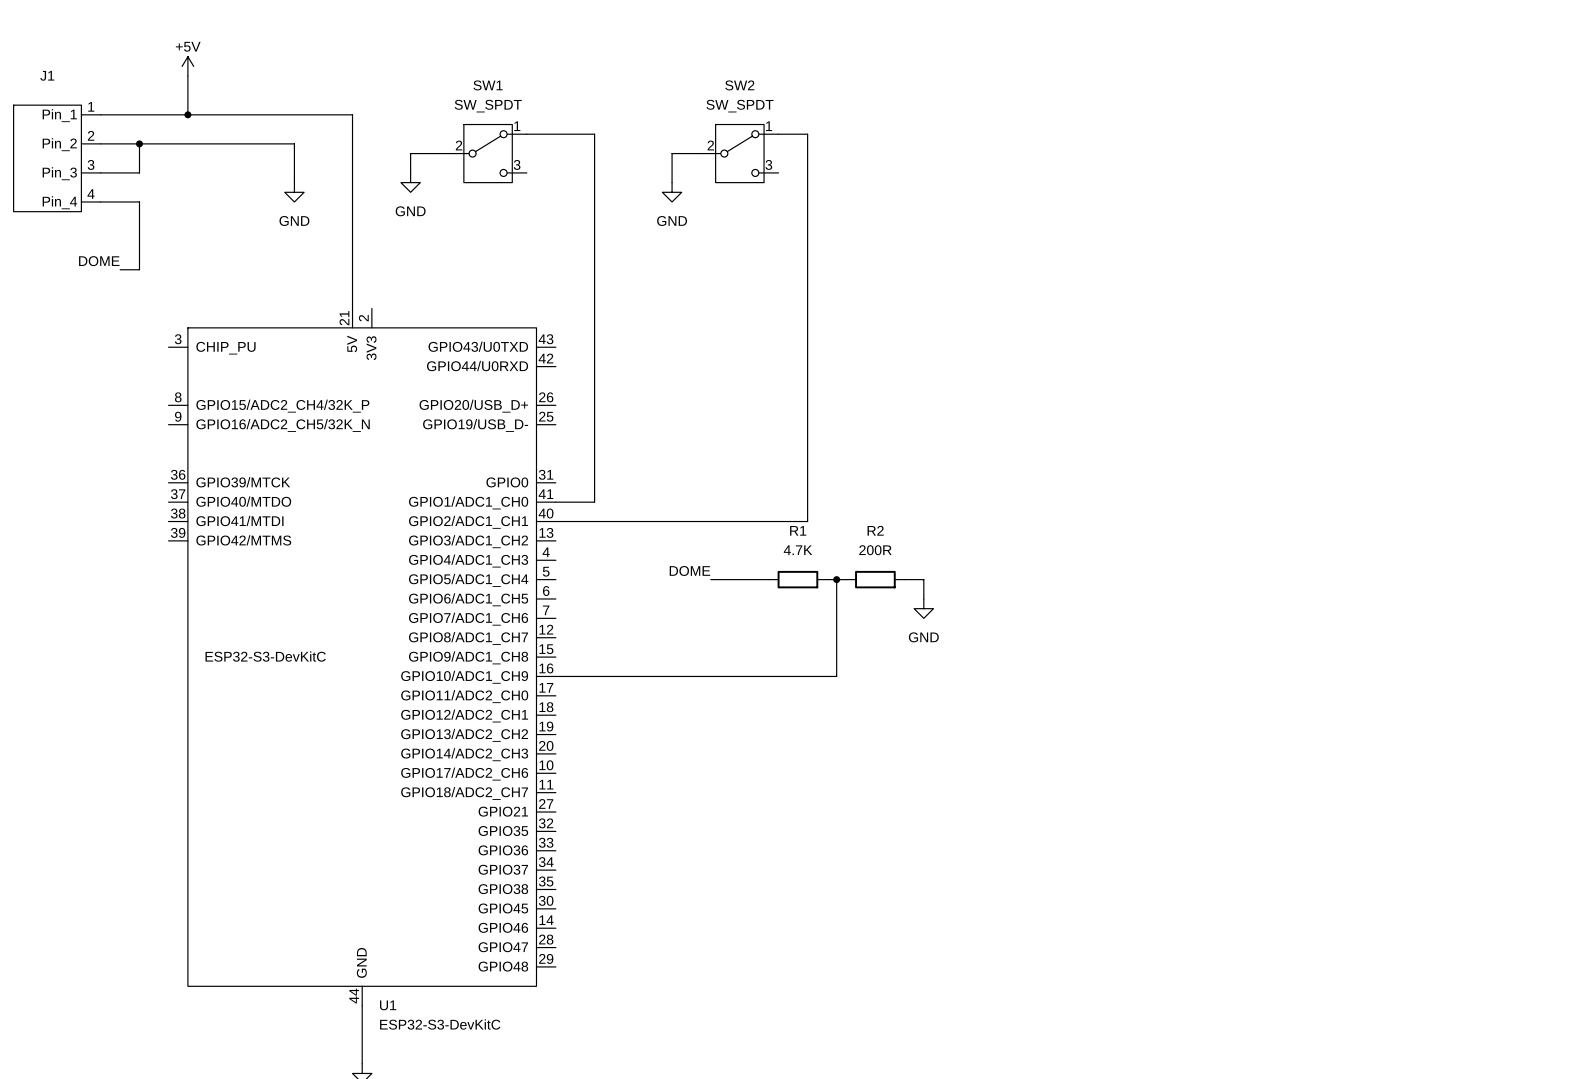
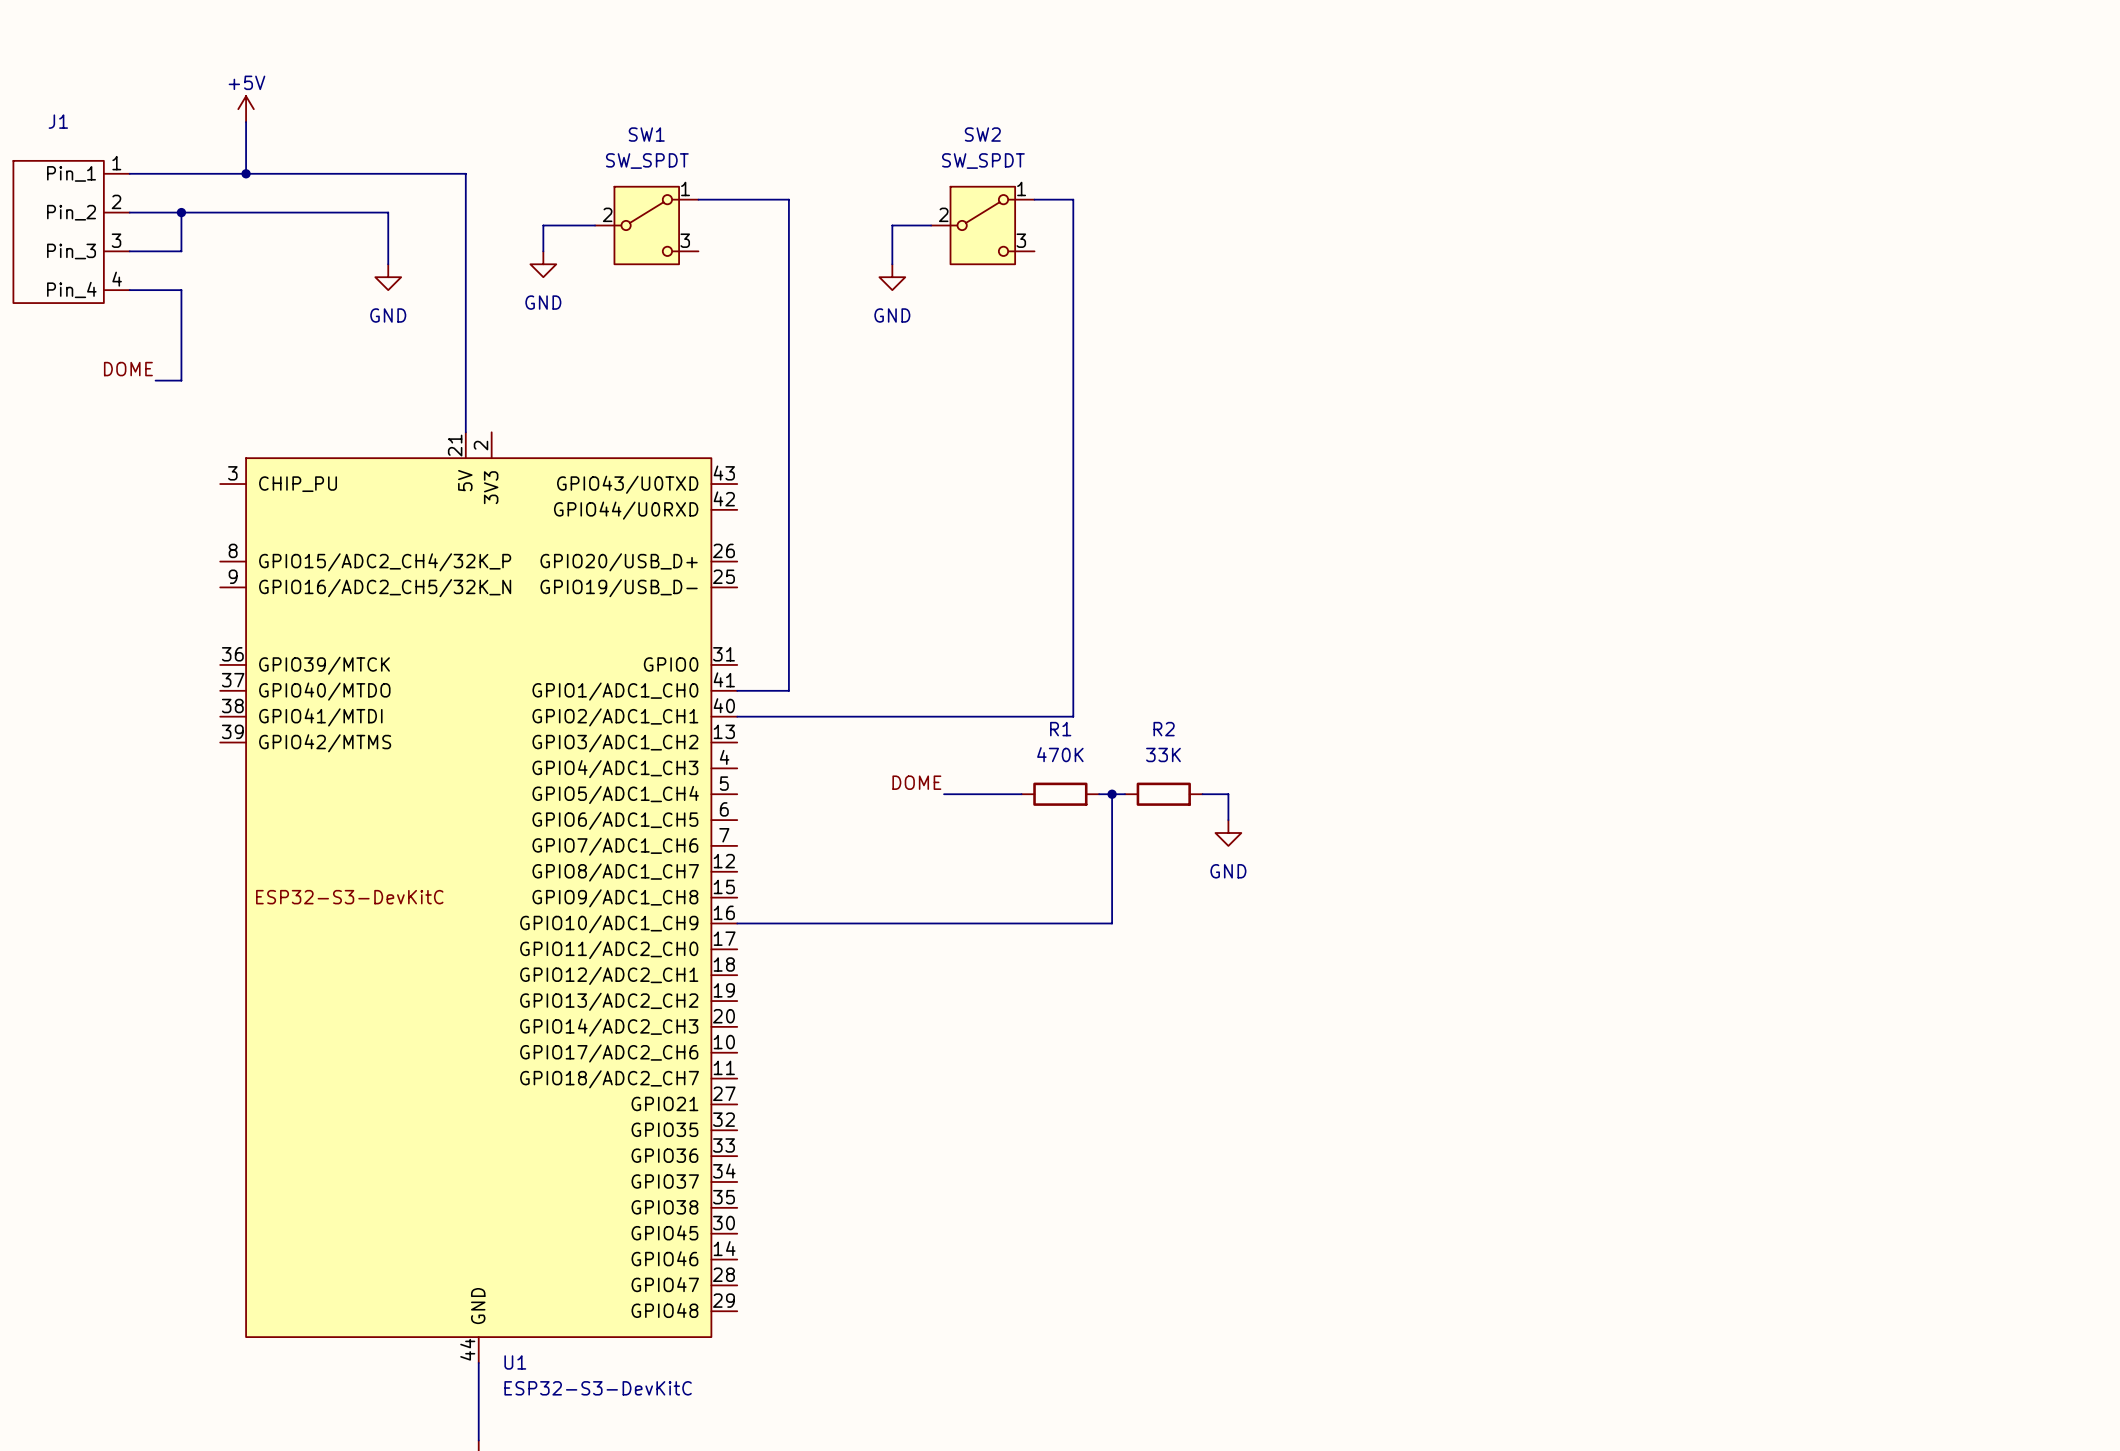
R1 value: 4.7K (798, 550) -> 470K (1060, 754)
R2 value: 200R (875, 550) -> 33K (1163, 754)

